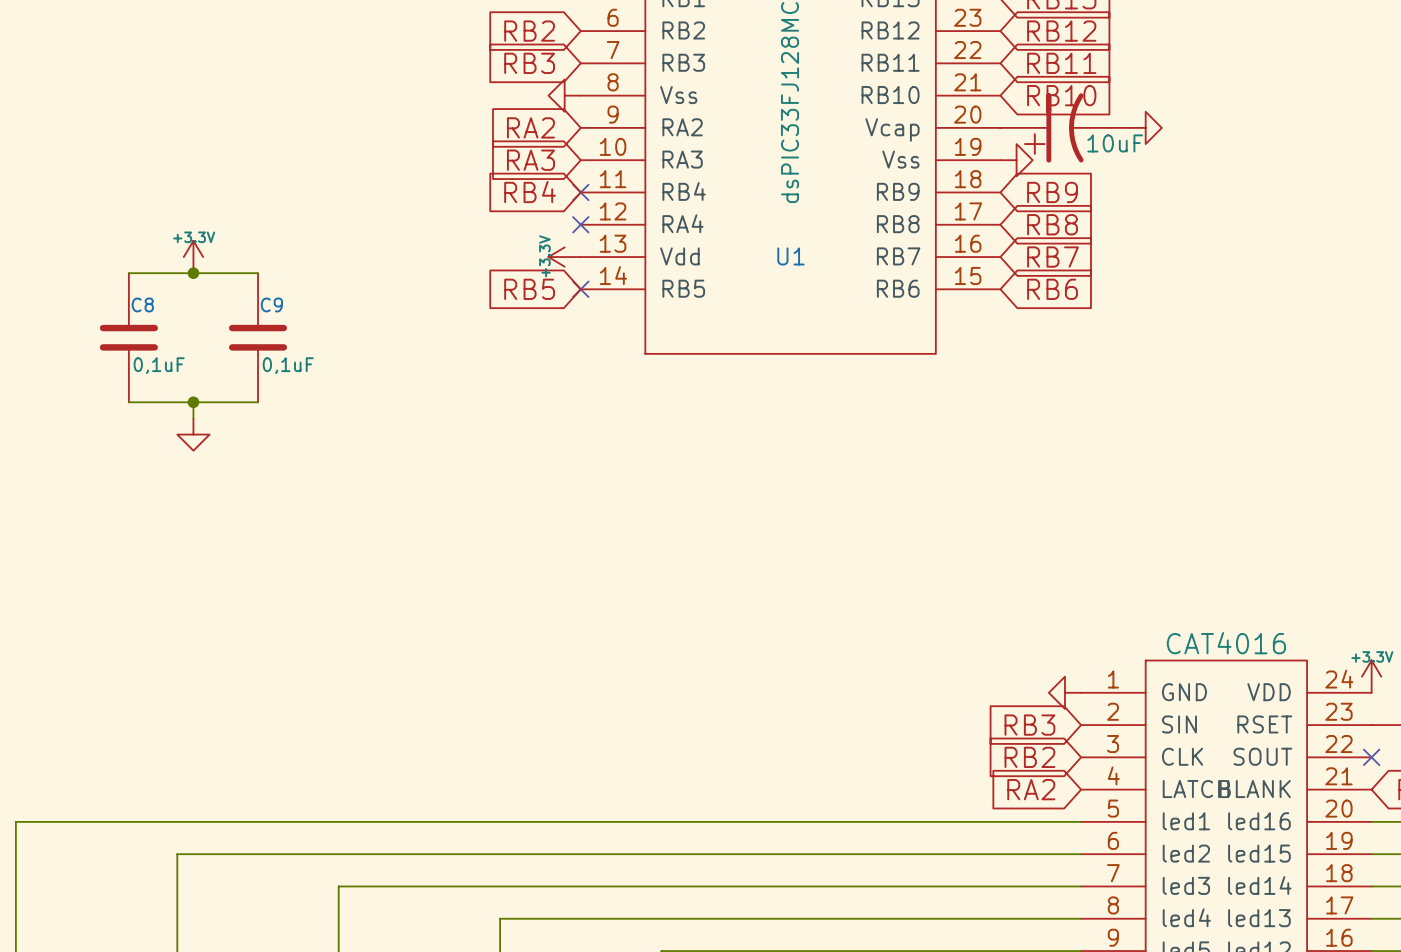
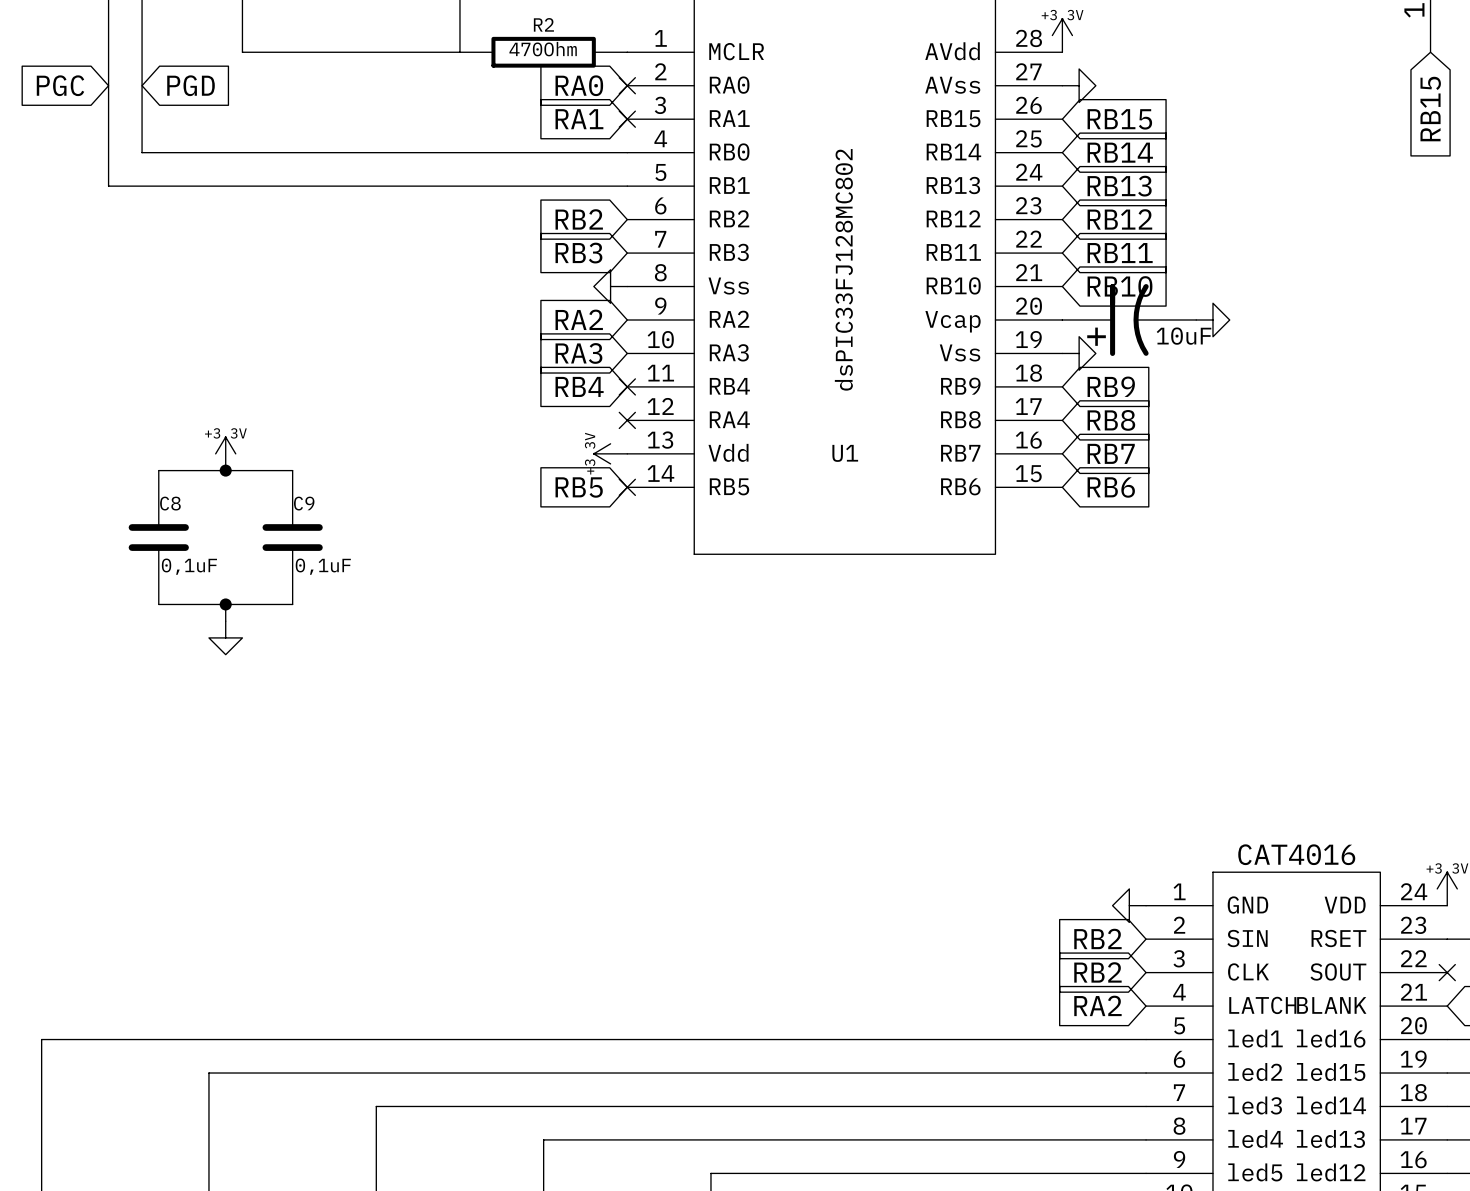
global label: RB3 (1029, 725) -> RB2 (1097, 938)

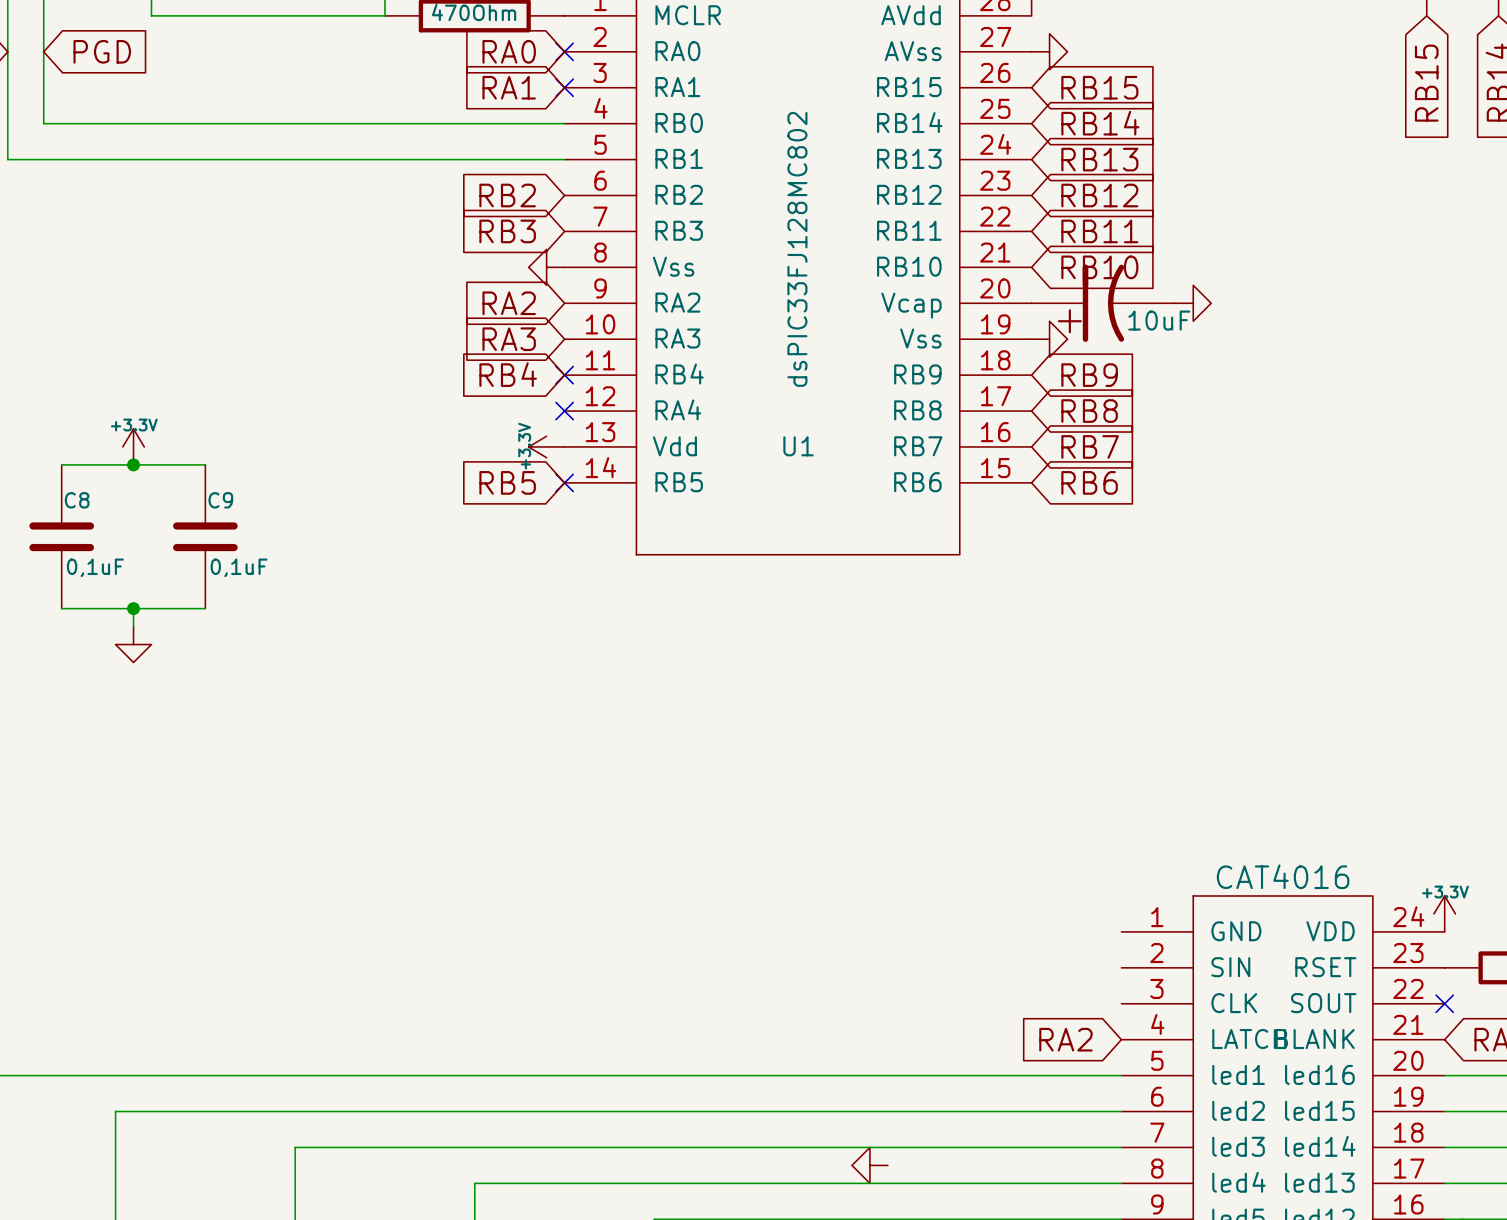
power symbol position: (1129, 905) -> (869, 1165)
global label: RB2 (1097, 938) -> none
global label: RB2 (1097, 972) -> none

